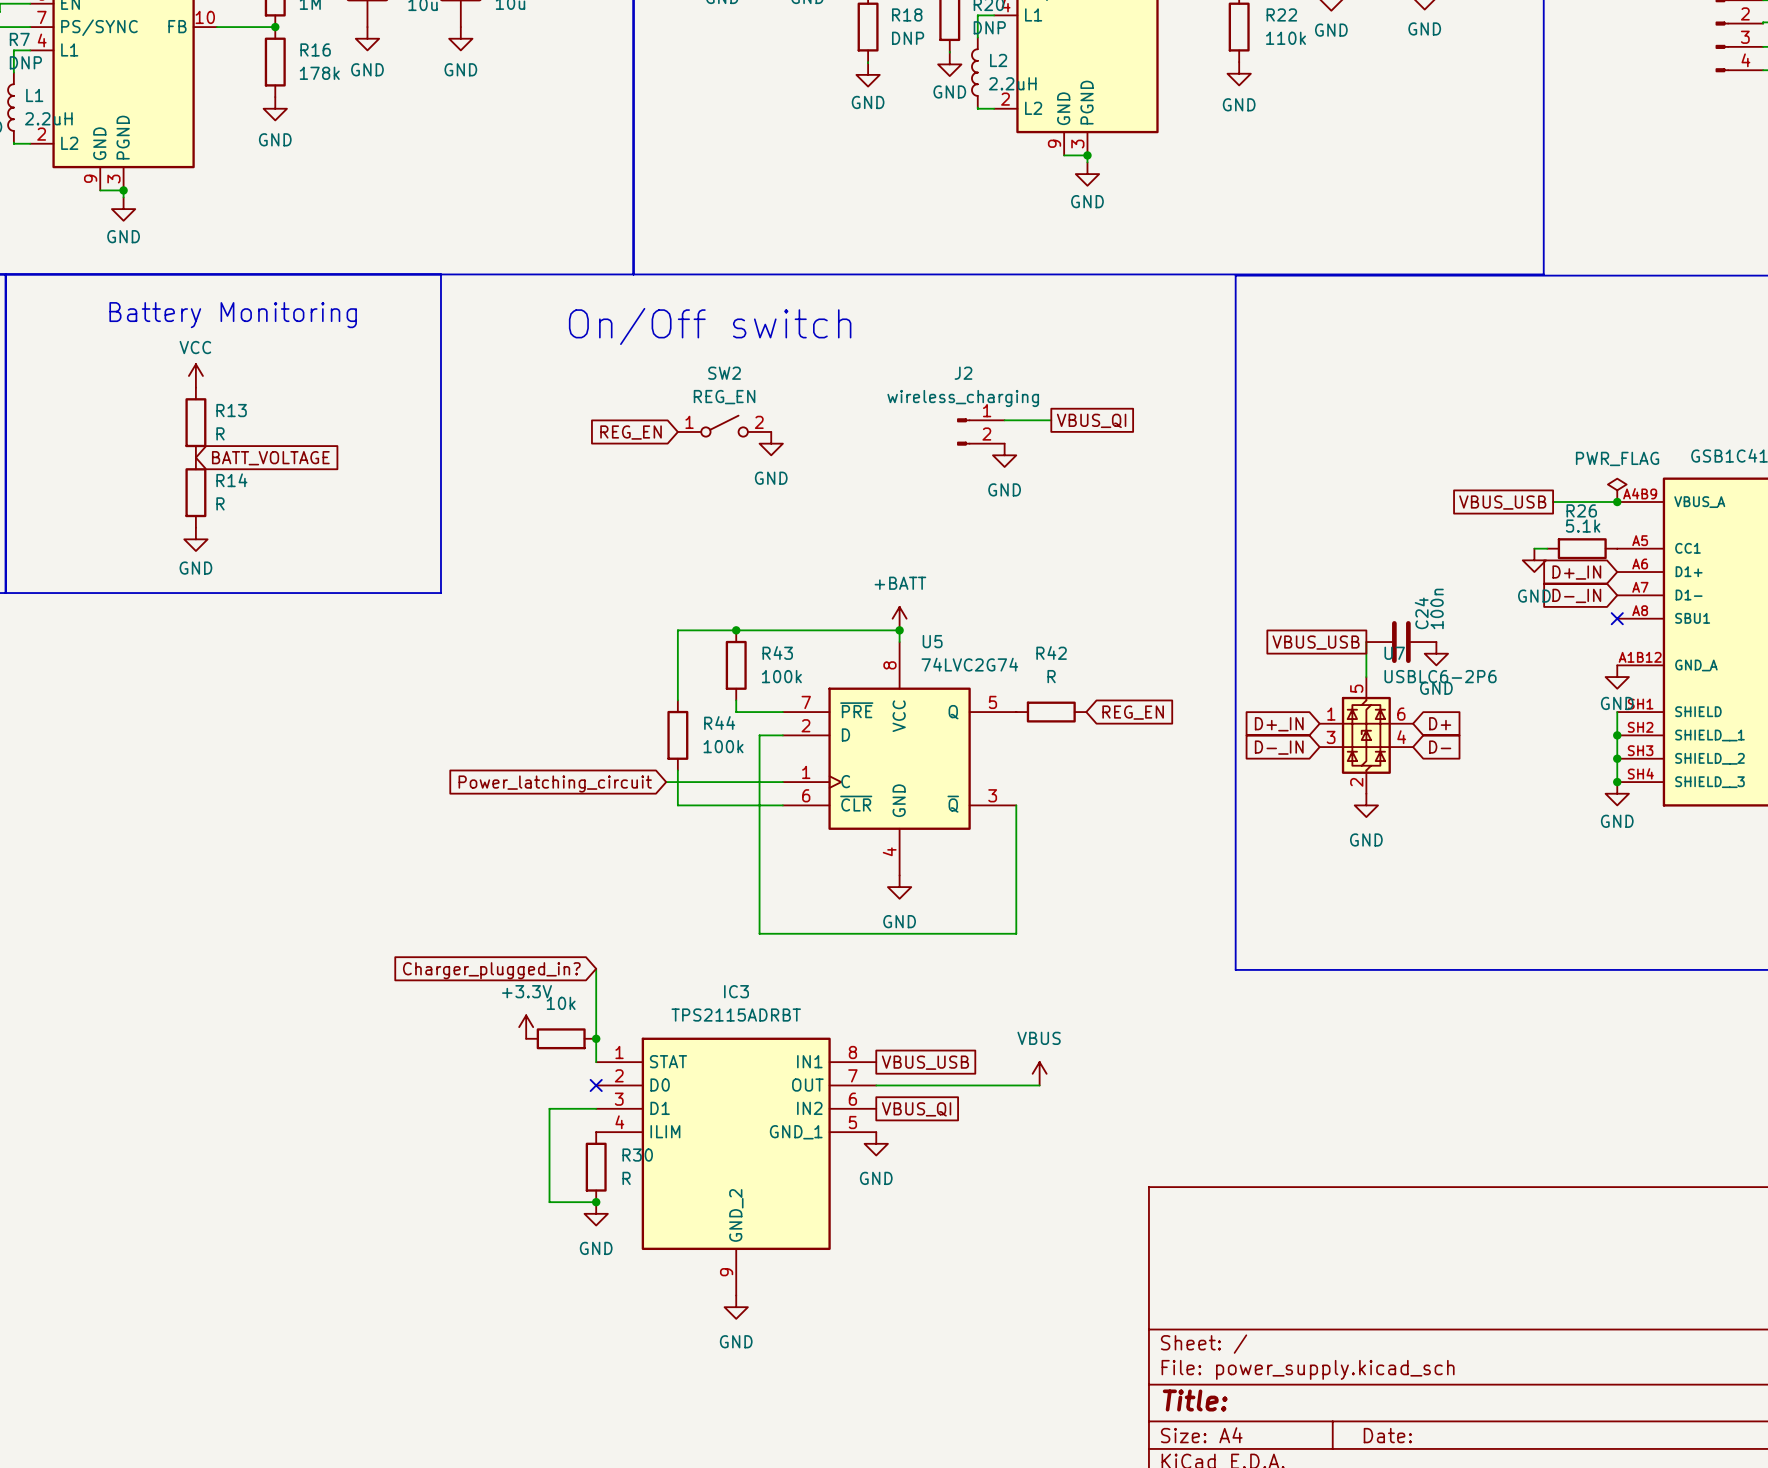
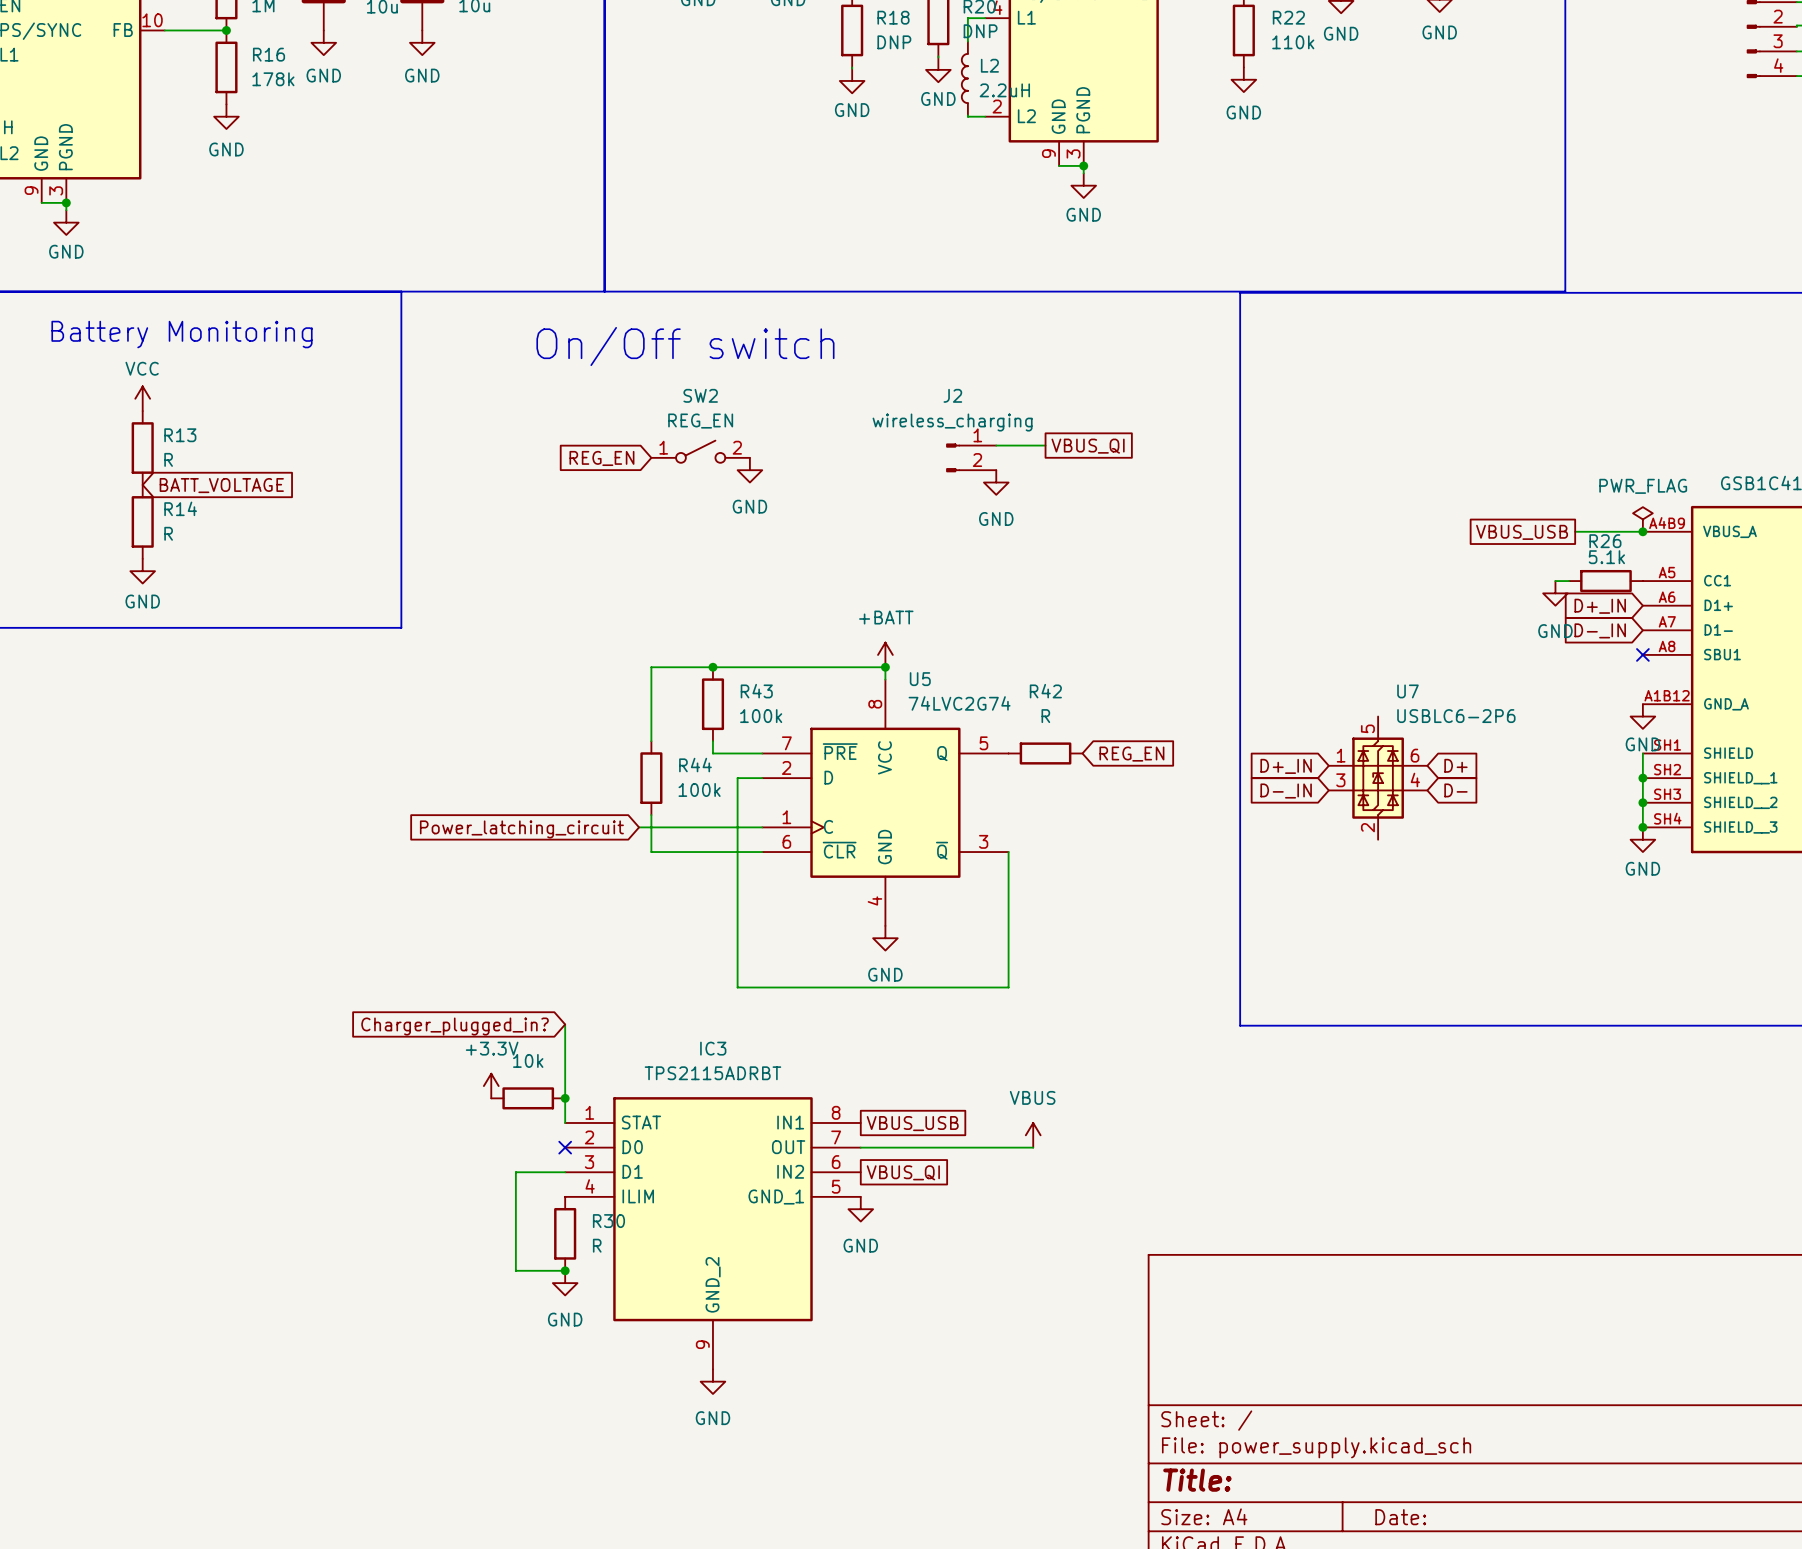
global label: VBUS_USB (1316, 642) -> none
wire: (1366, 642) (1366, 677) -> none
C24: 100n (1401, 642) -> none
power symbol: GND (1436, 653) -> none
power symbol: GND (1366, 805) -> none

